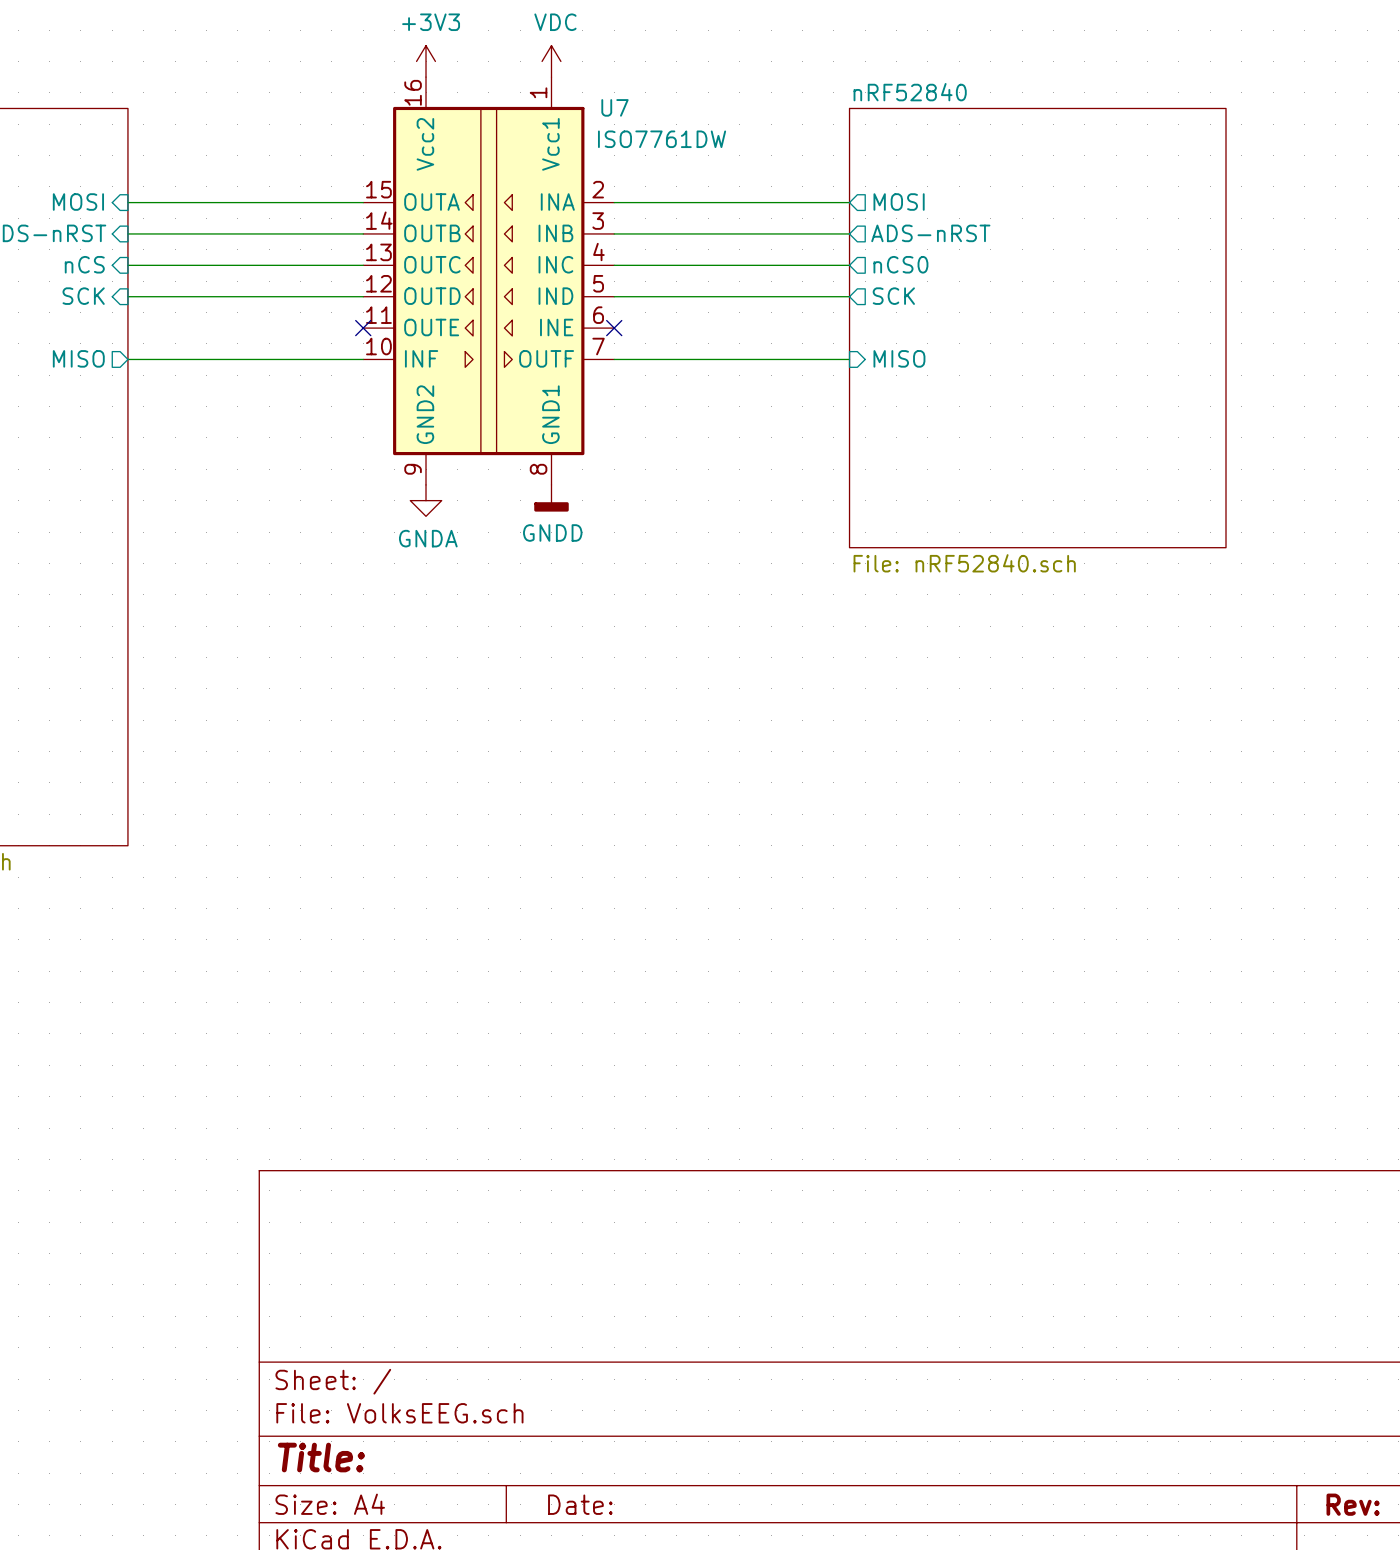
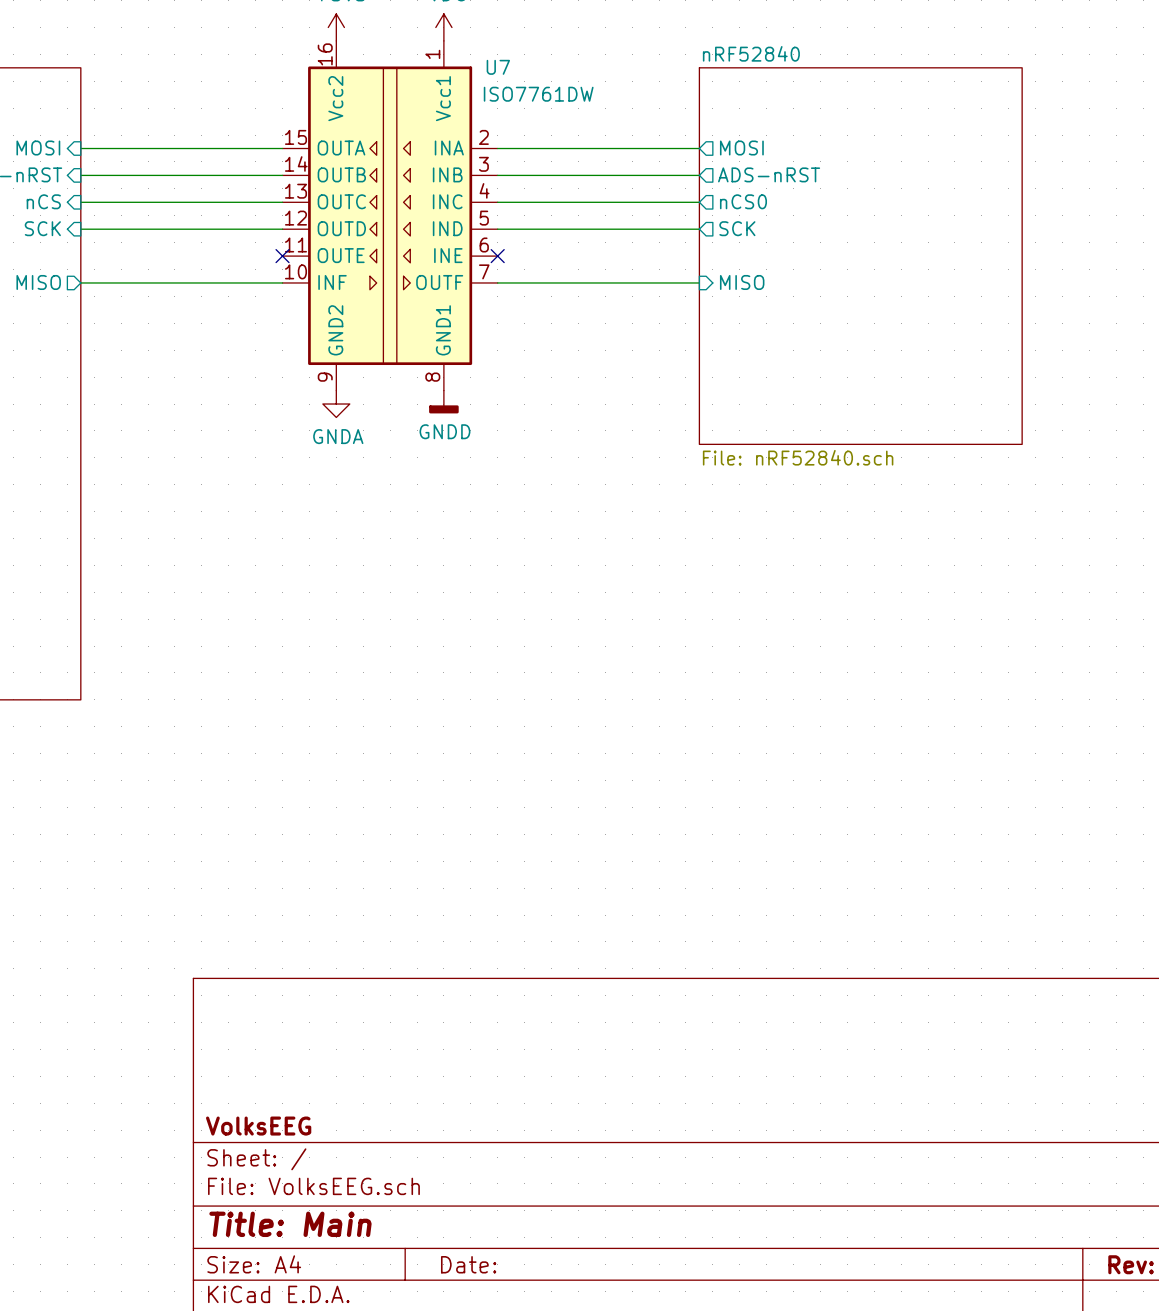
title block: none -> VolksEEG (258, 1126)
title block: Title: (321, 1457) -> Title: Main (290, 1224)

